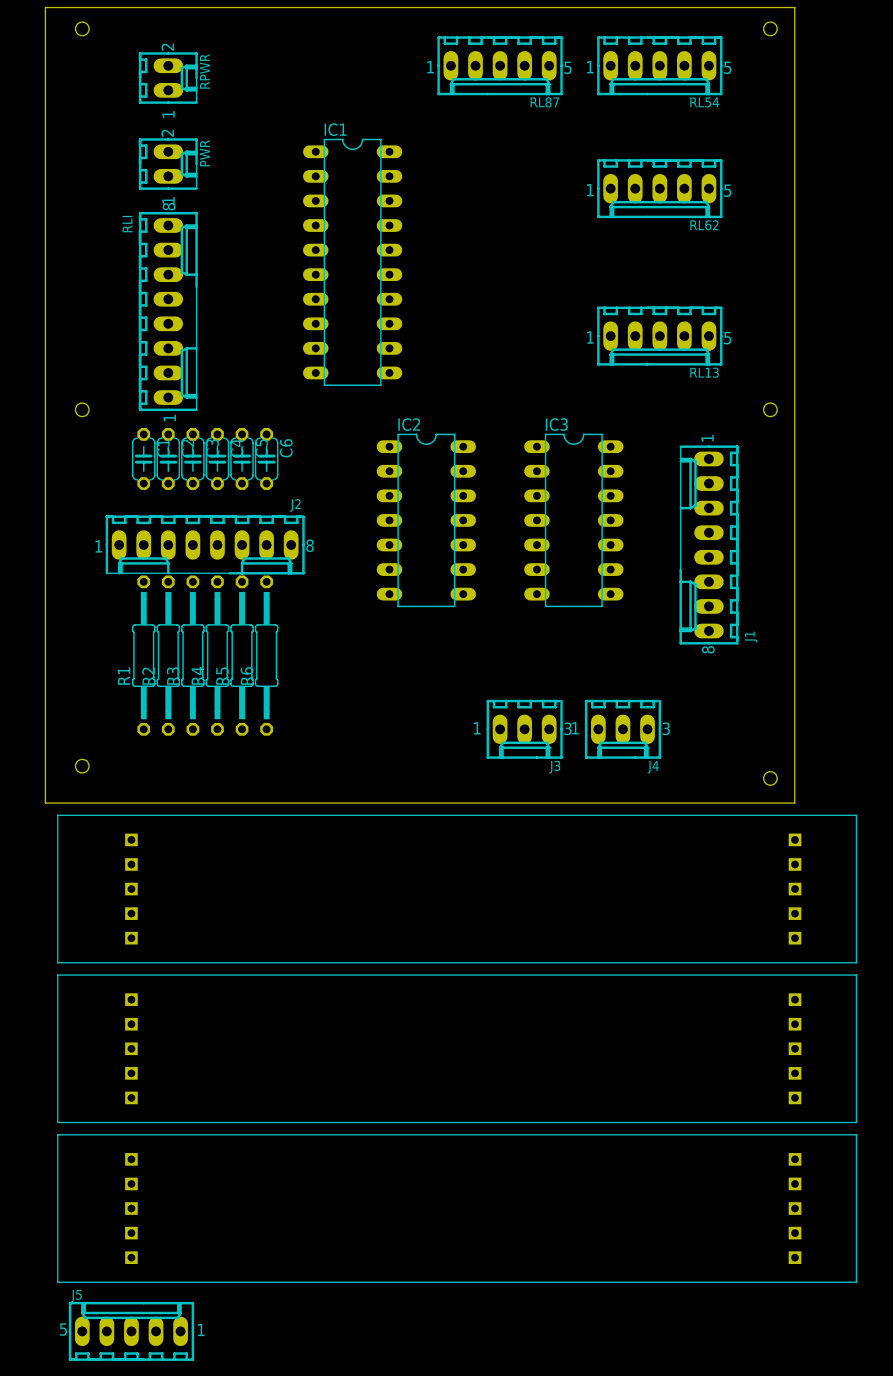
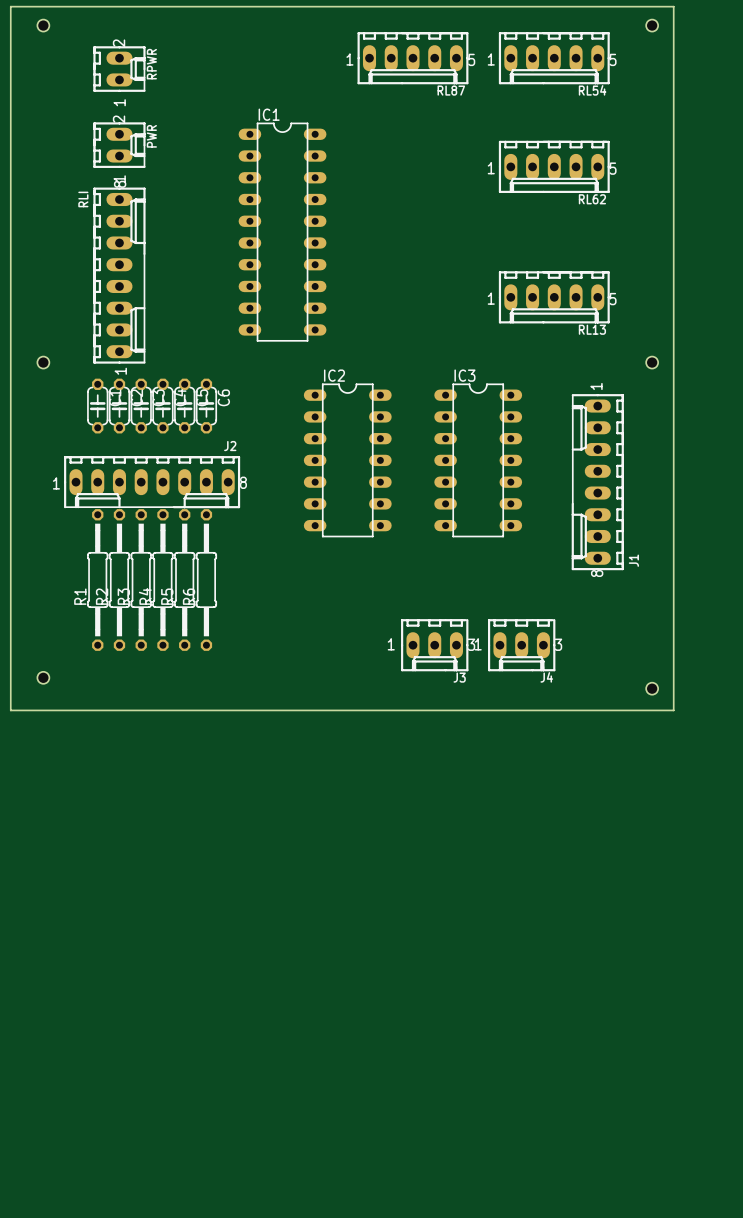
part: (457, 889) -> none
part: (457, 1048) -> none
part: (457, 1208) -> none
J5: (131, 1331) -> none

